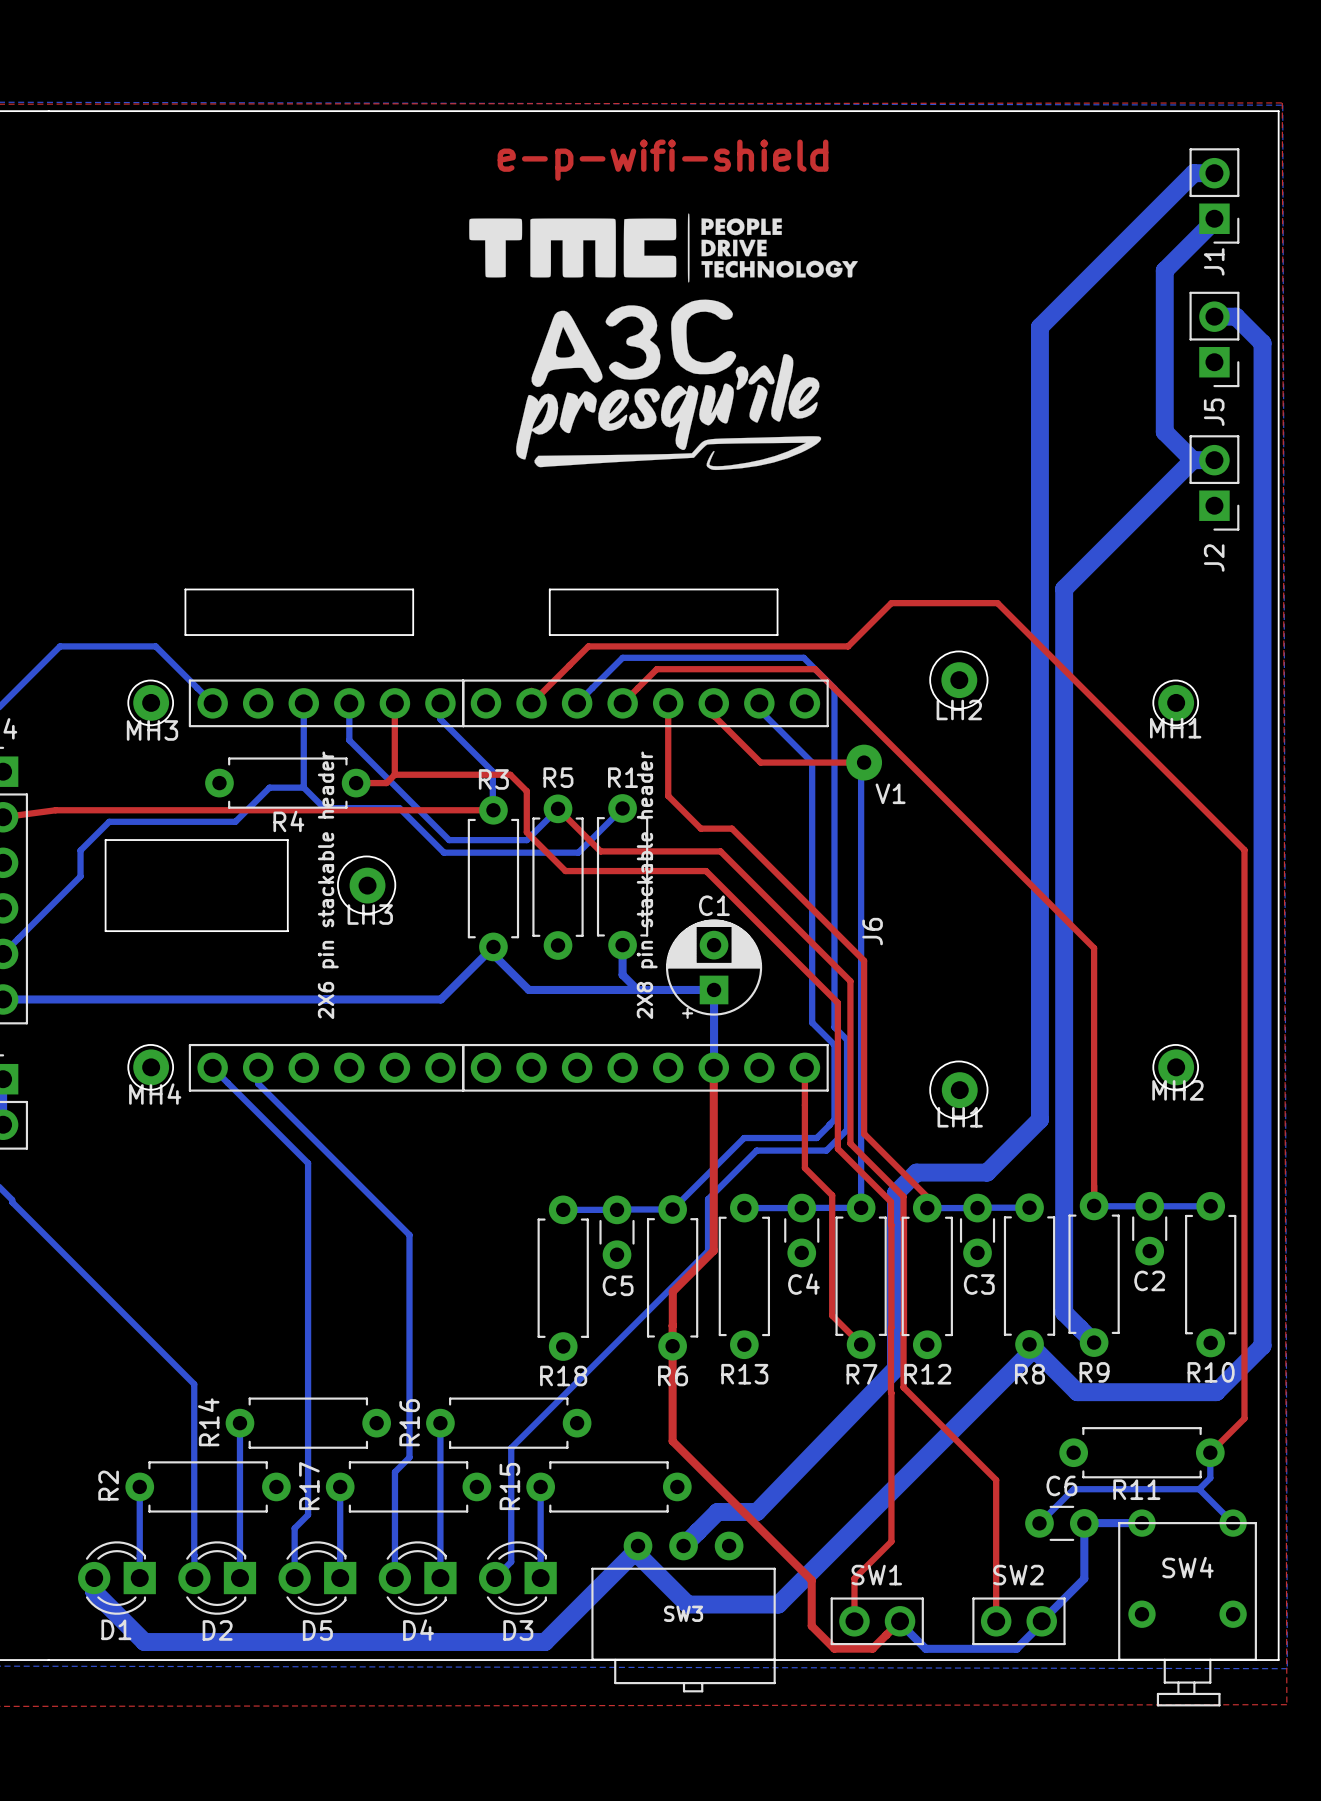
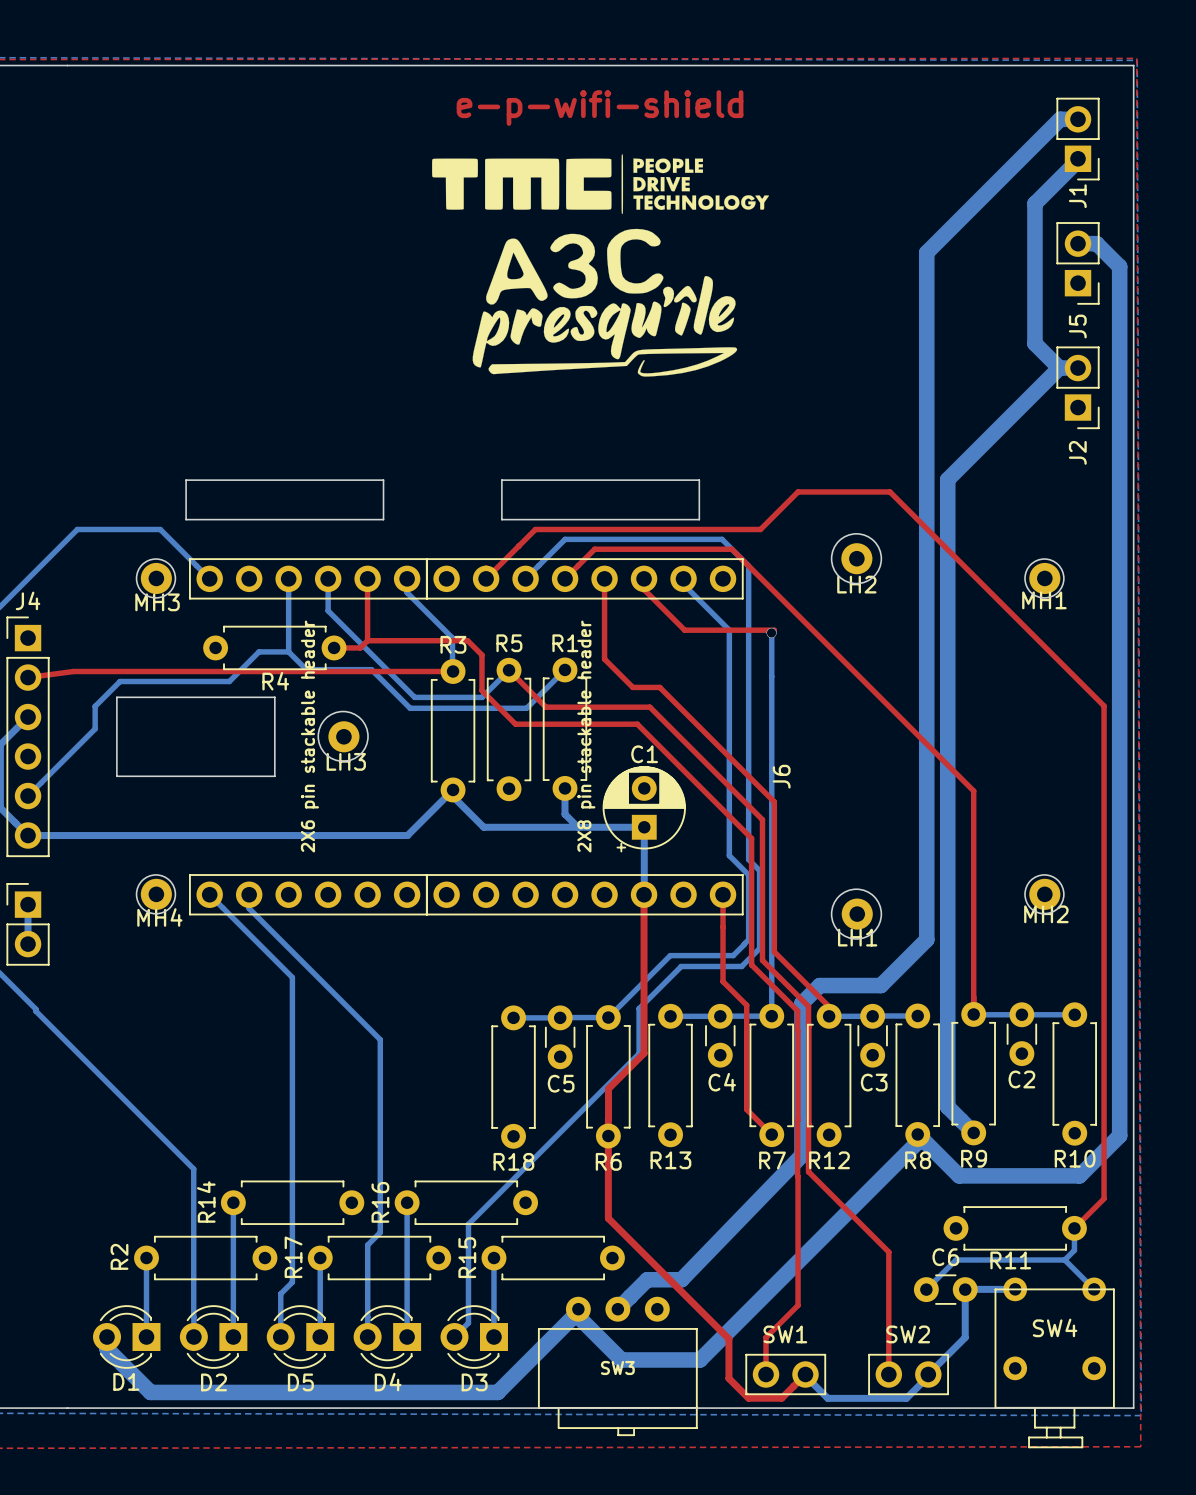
V1: (864, 762) -> none
via: none -> (771, 632)

